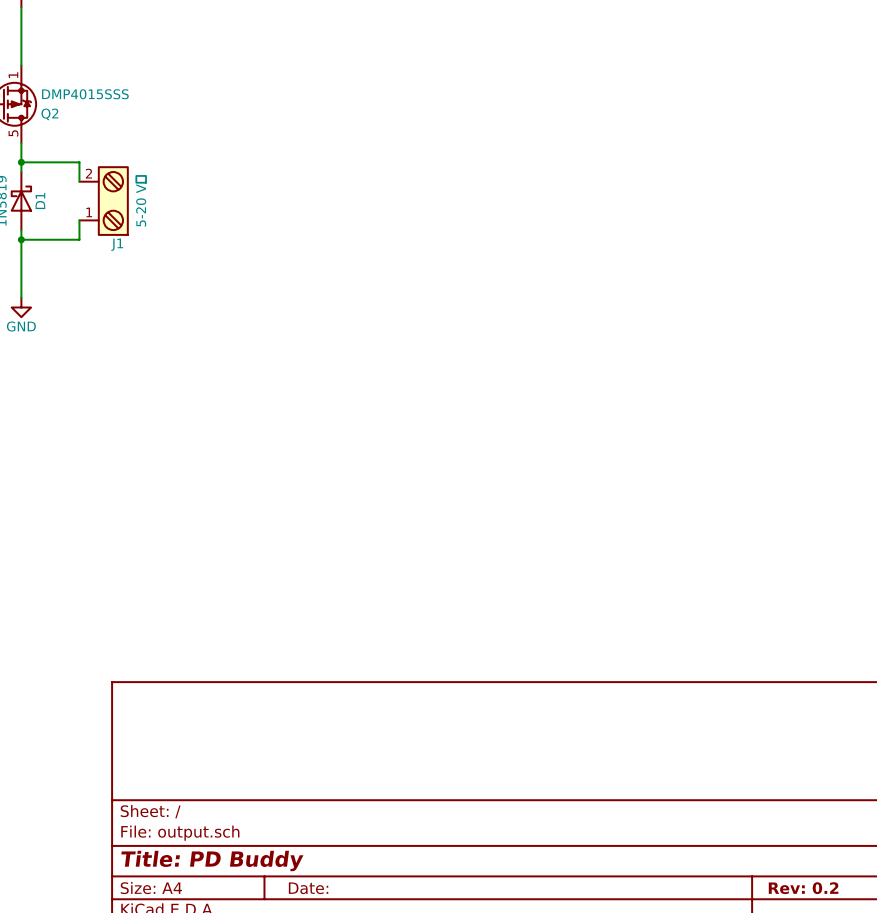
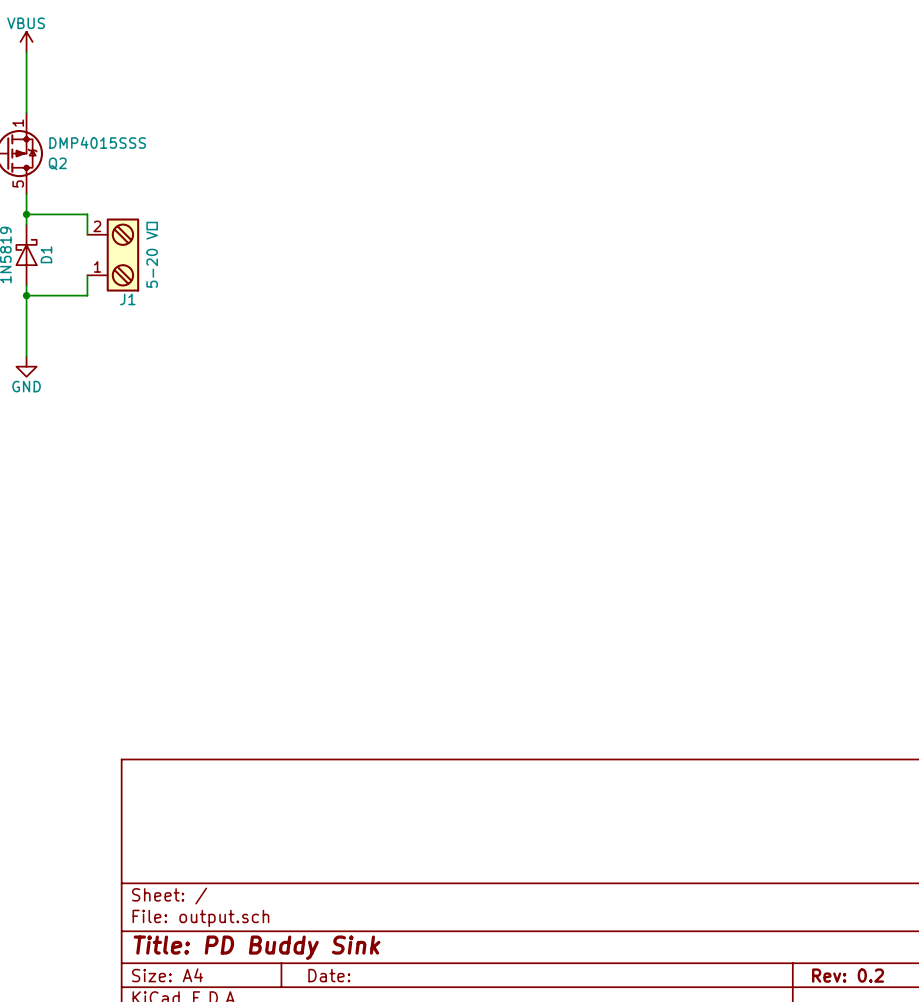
title block: Title: PD Buddy (212, 861) -> Title: PD Buddy Sink (257, 947)

